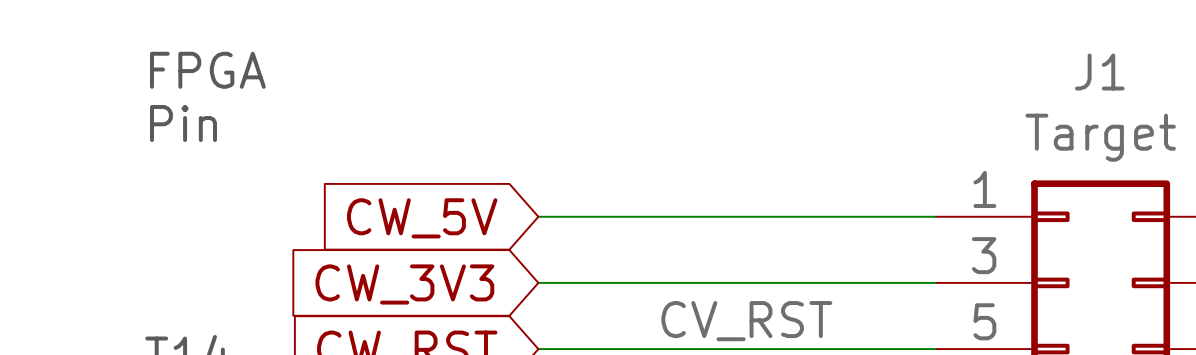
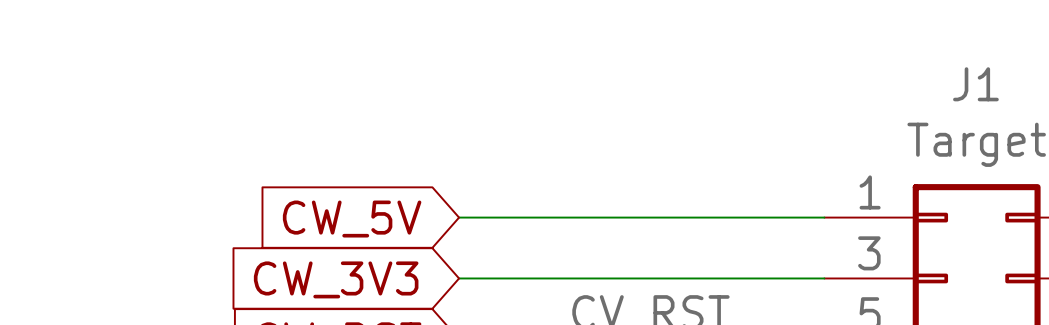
text: FPGA (207, 70) -> none
text: Pin (183, 123) -> none

